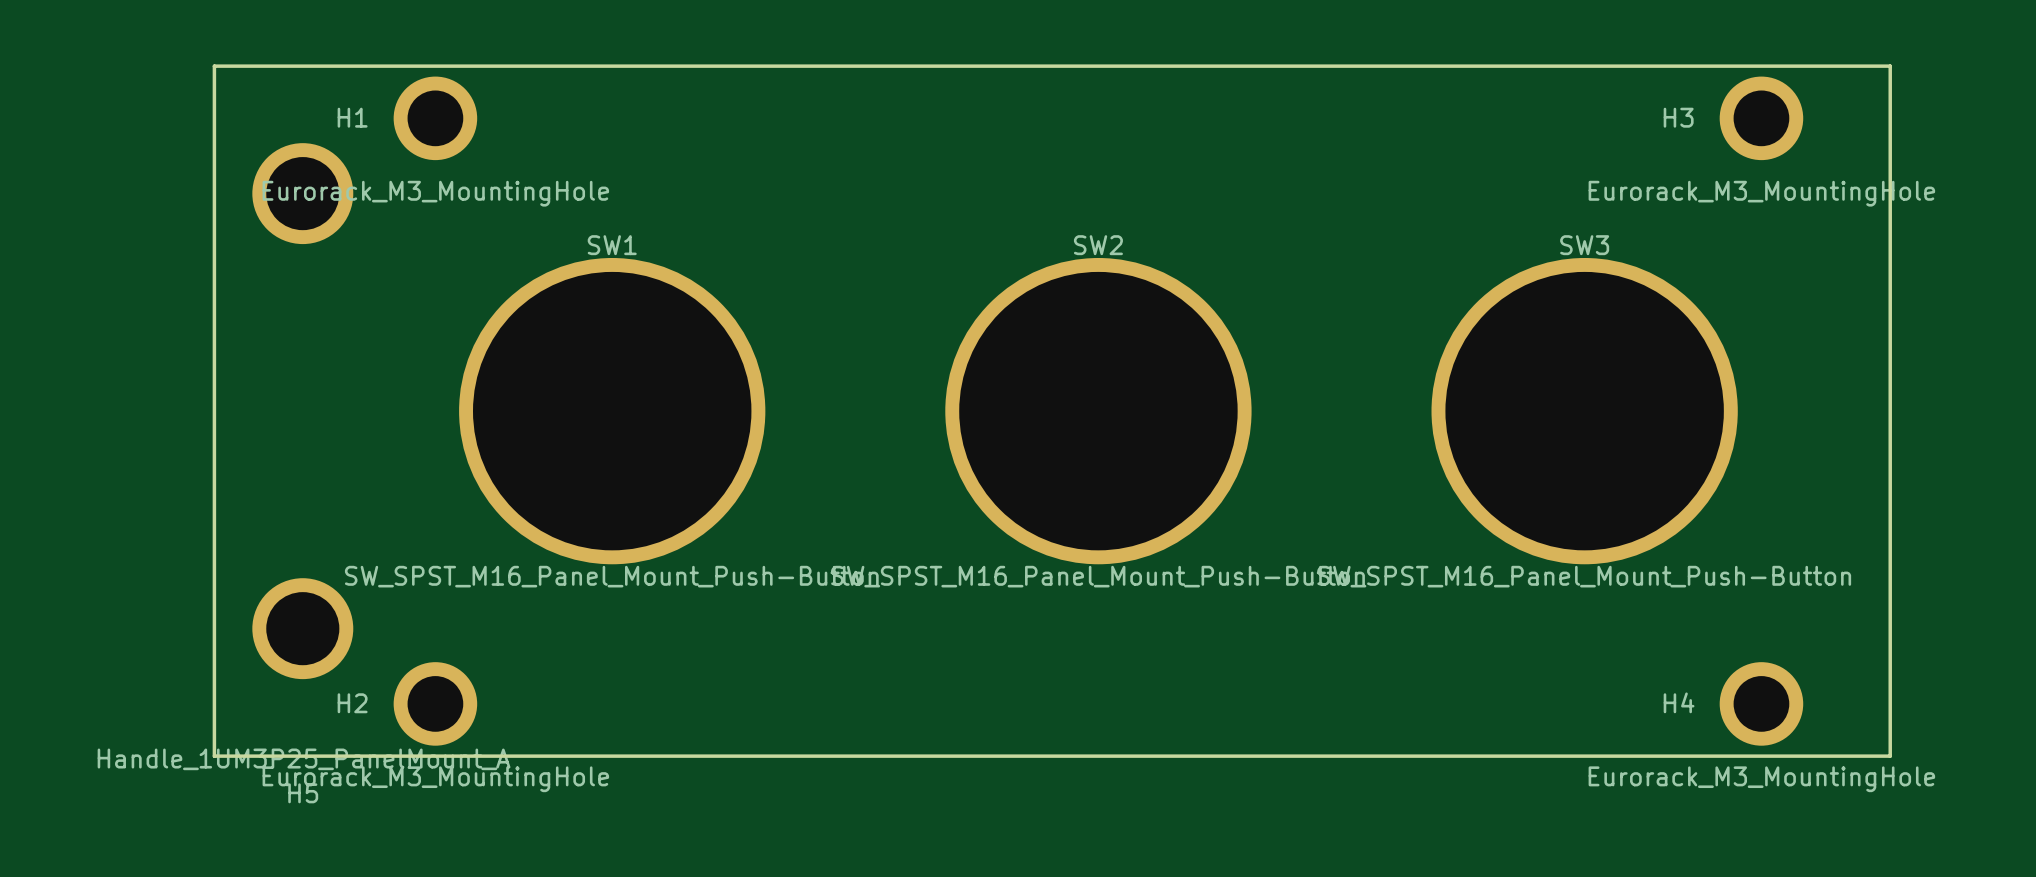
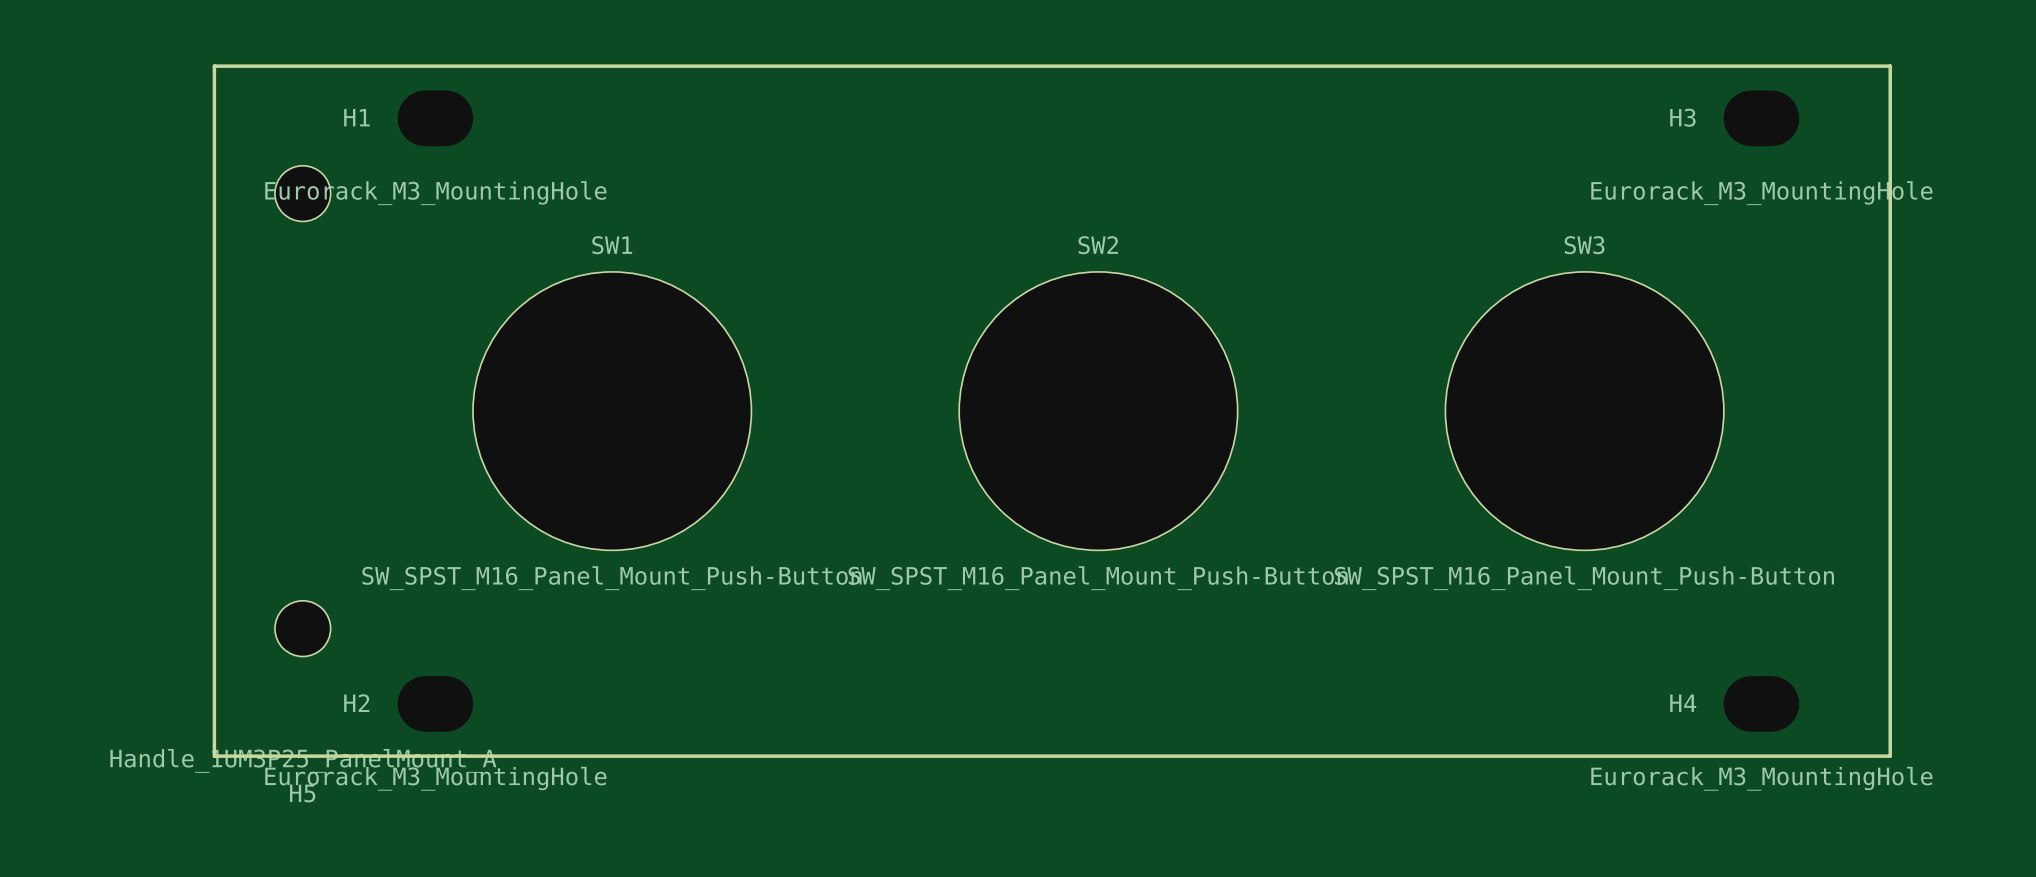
H1 footprint: [393, 76, 478, 161] -> [397, 90, 474, 147]
H3 footprint: [1719, 76, 1804, 161] -> [1723, 90, 1800, 147]
H5 footprint: [252, 143, 354, 680] -> [274, 165, 331, 657]
SW1 footprint: [459, 257, 766, 565] -> [473, 271, 752, 551]
SW2 footprint: [945, 257, 1252, 565] -> [959, 271, 1238, 551]
SW3 footprint: [1431, 257, 1738, 565] -> [1445, 271, 1724, 551]
H2 footprint: [393, 662, 478, 746] -> [397, 676, 474, 732]
H4 footprint: [1719, 662, 1804, 746] -> [1723, 676, 1800, 732]

